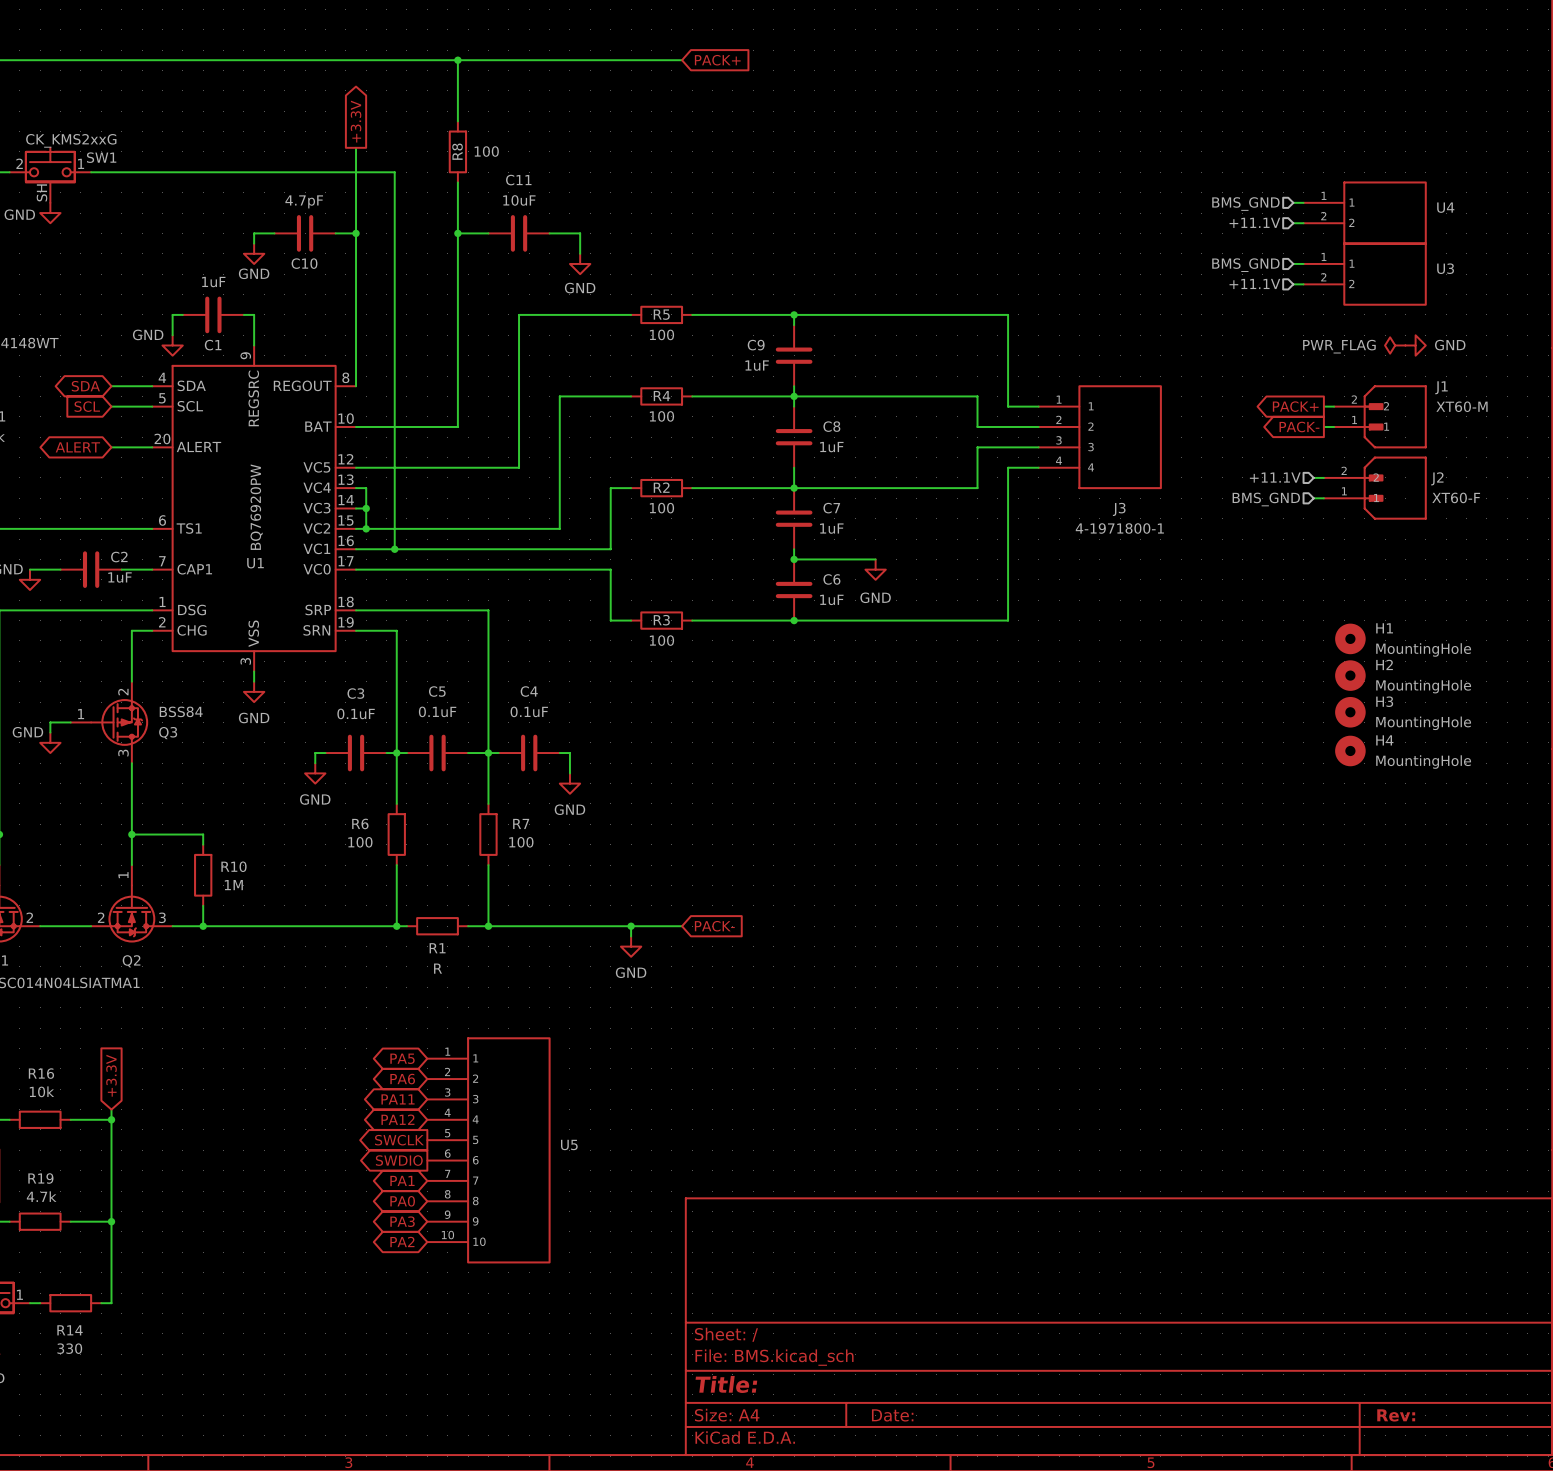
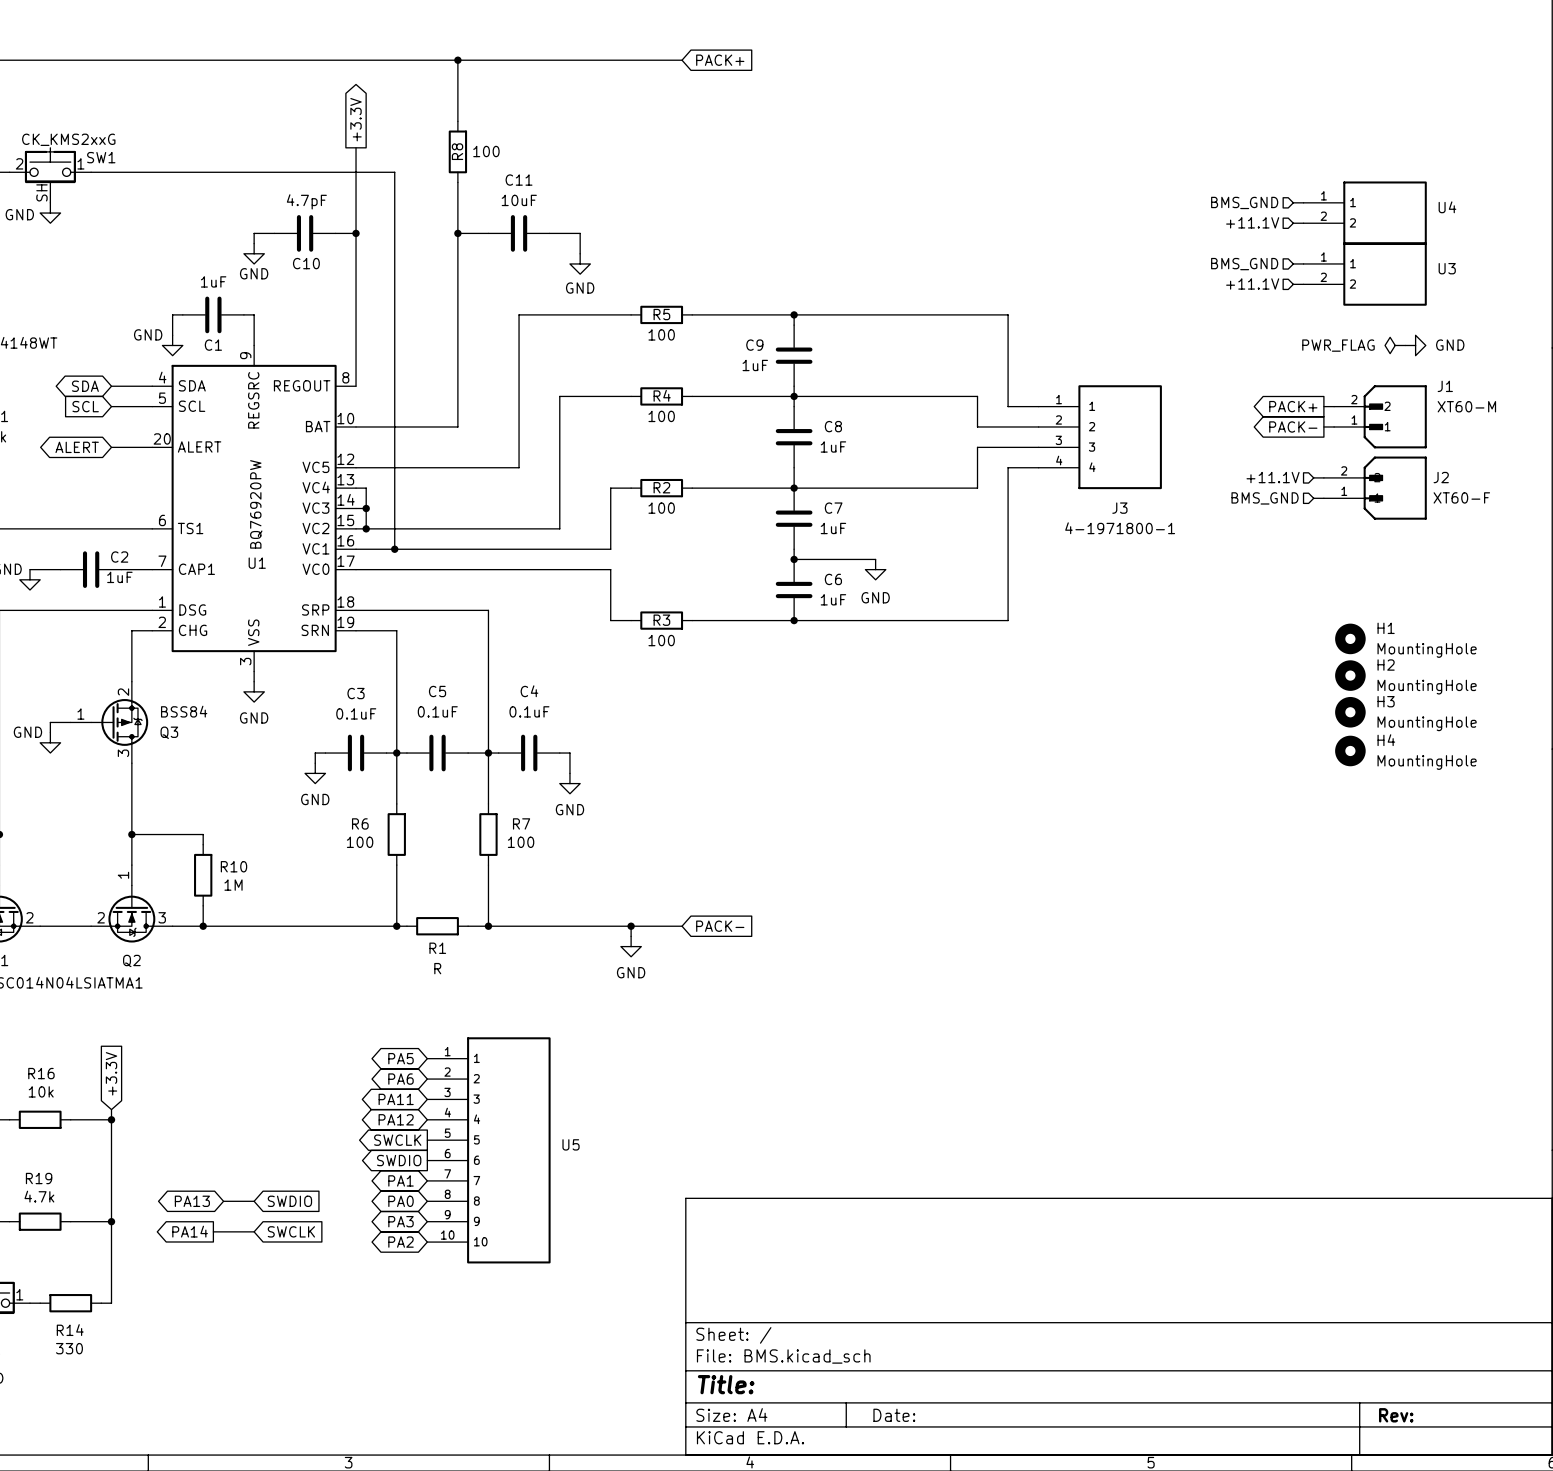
global label: none -> PA13 (192, 1201)
wire: none -> (223, 1201) (254, 1201)
global label: none -> SWDIO (289, 1201)
global label: none -> PA14 (190, 1231)
wire: none -> (213, 1231) (254, 1231)
global label: none -> SWCLK (291, 1231)

